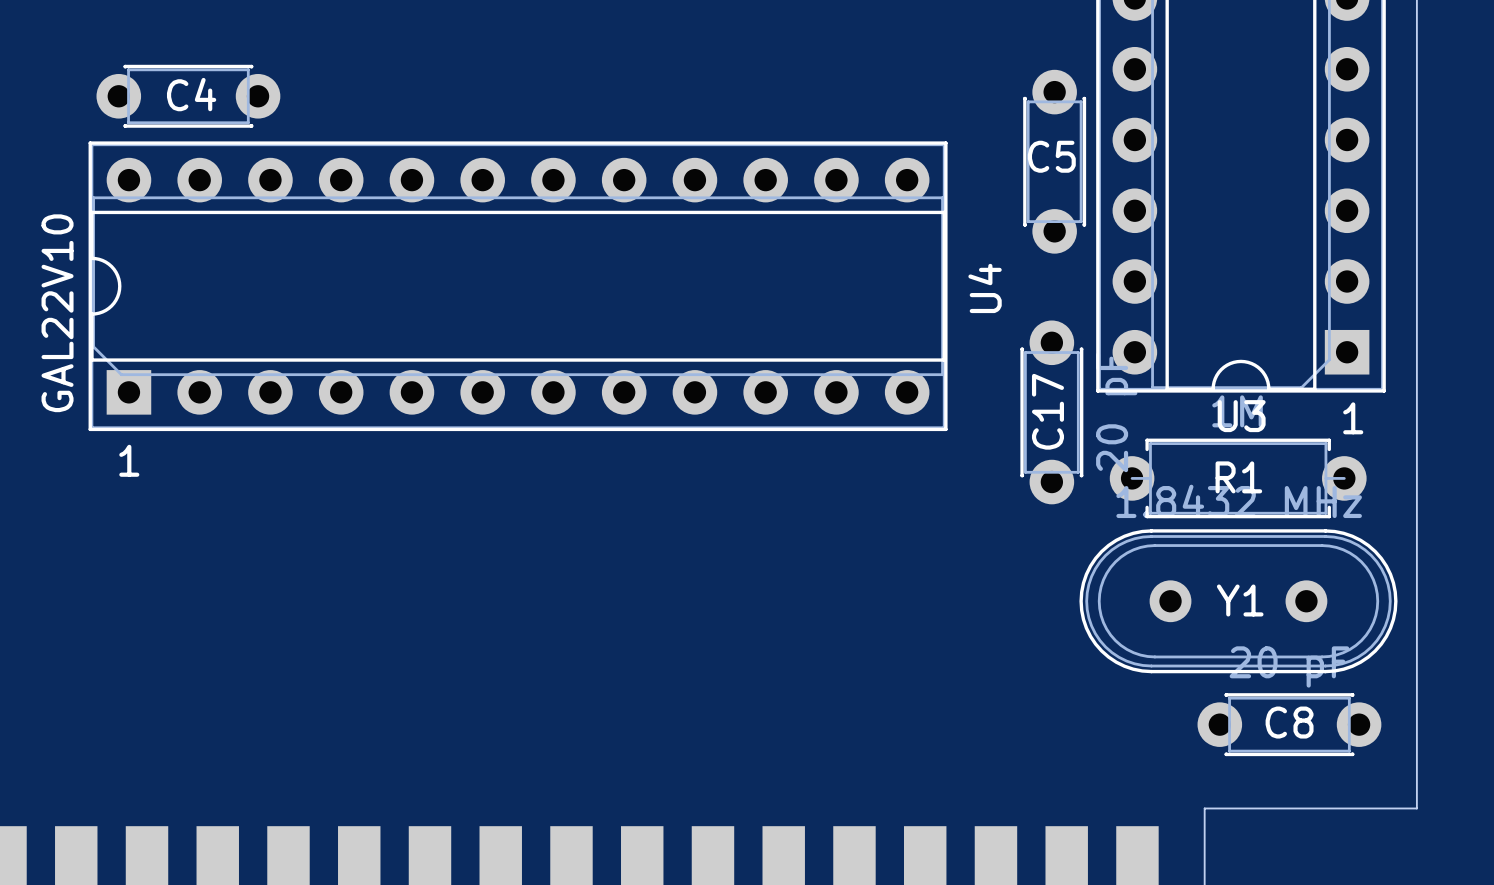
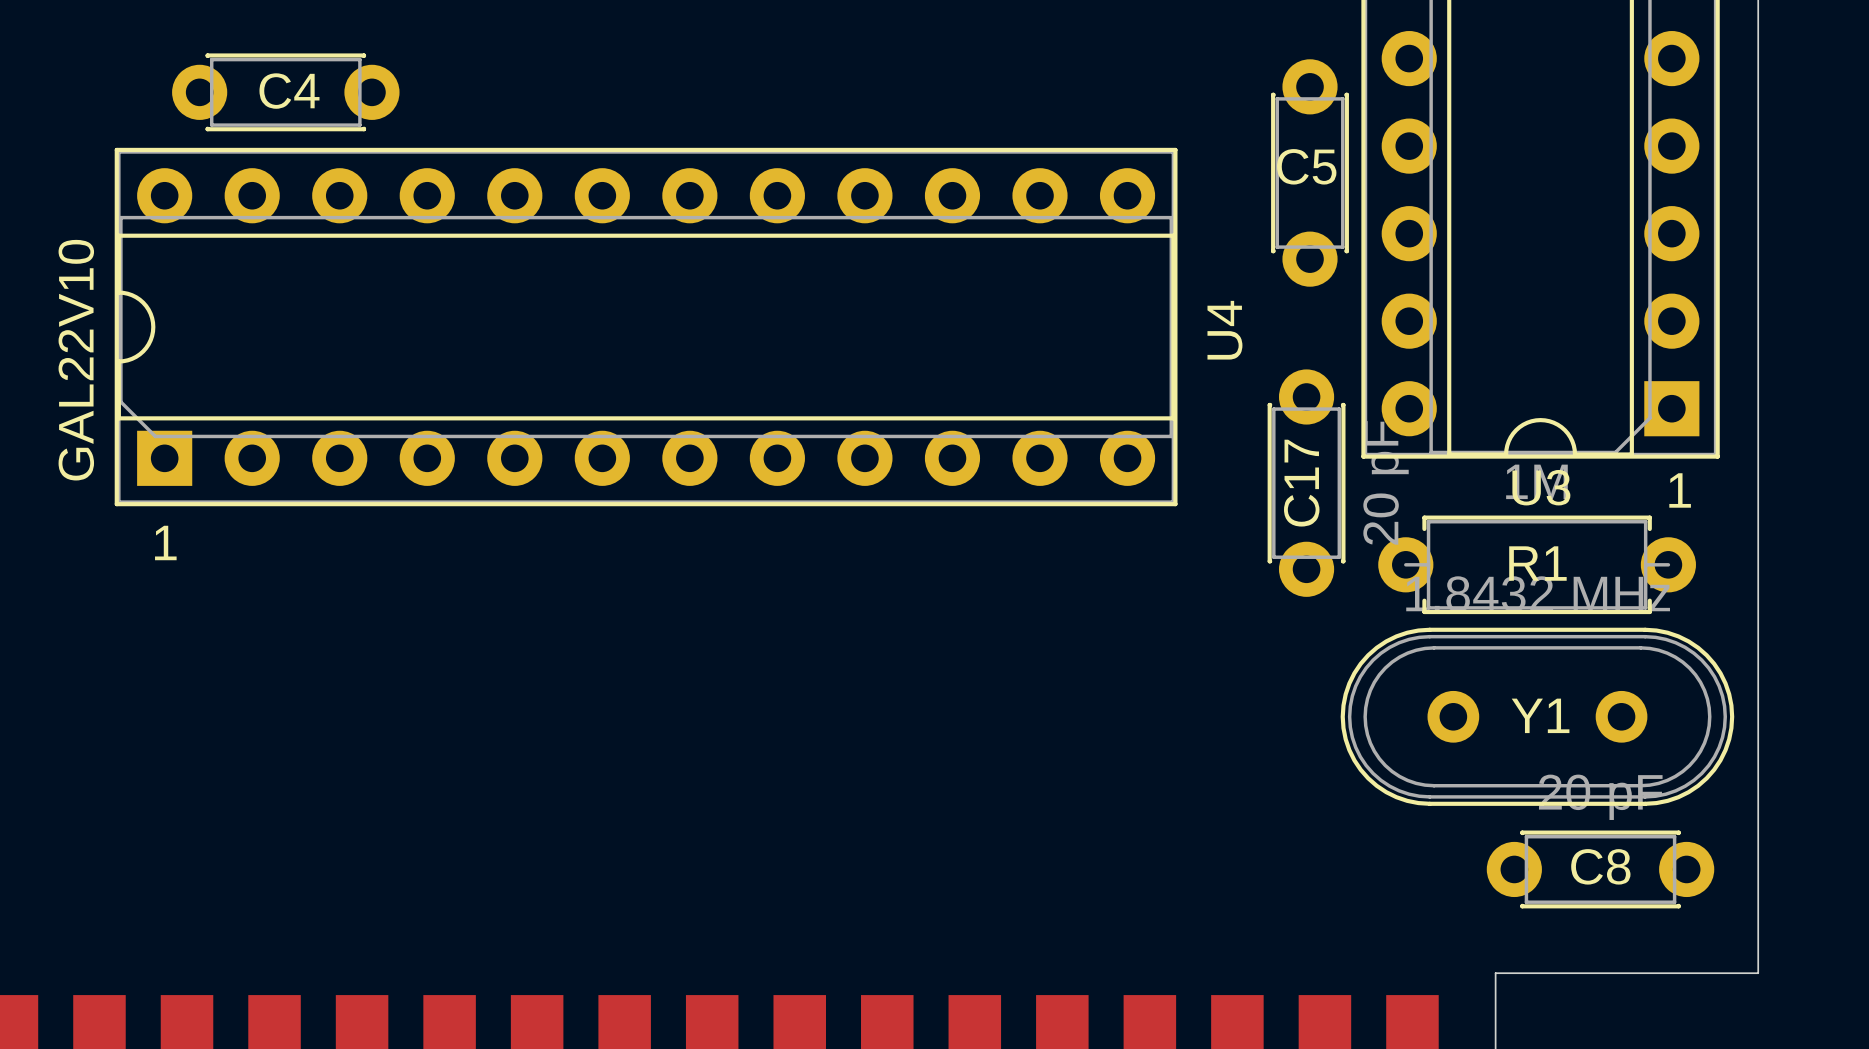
C4 position: (188, 96) -> (285, 92)

